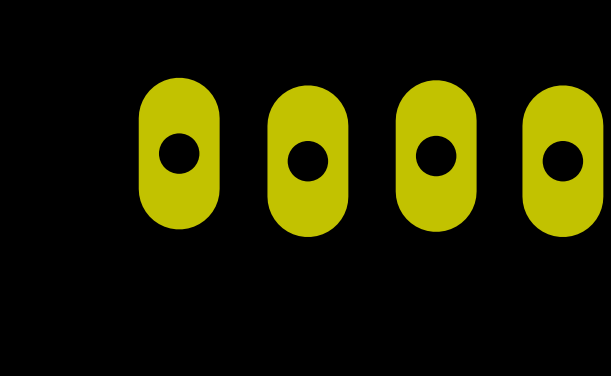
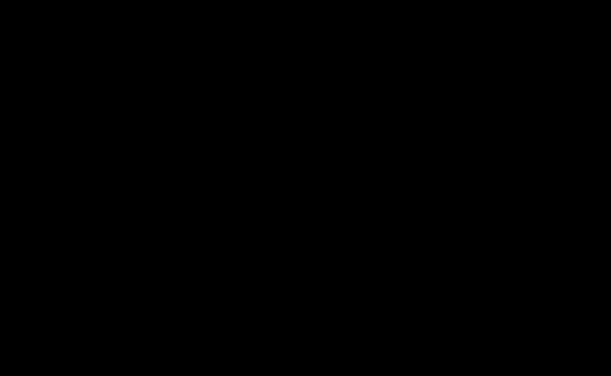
part: (179, 153) -> none
part: (436, 156) -> none
part: (307, 161) -> none
part: (562, 161) -> none

